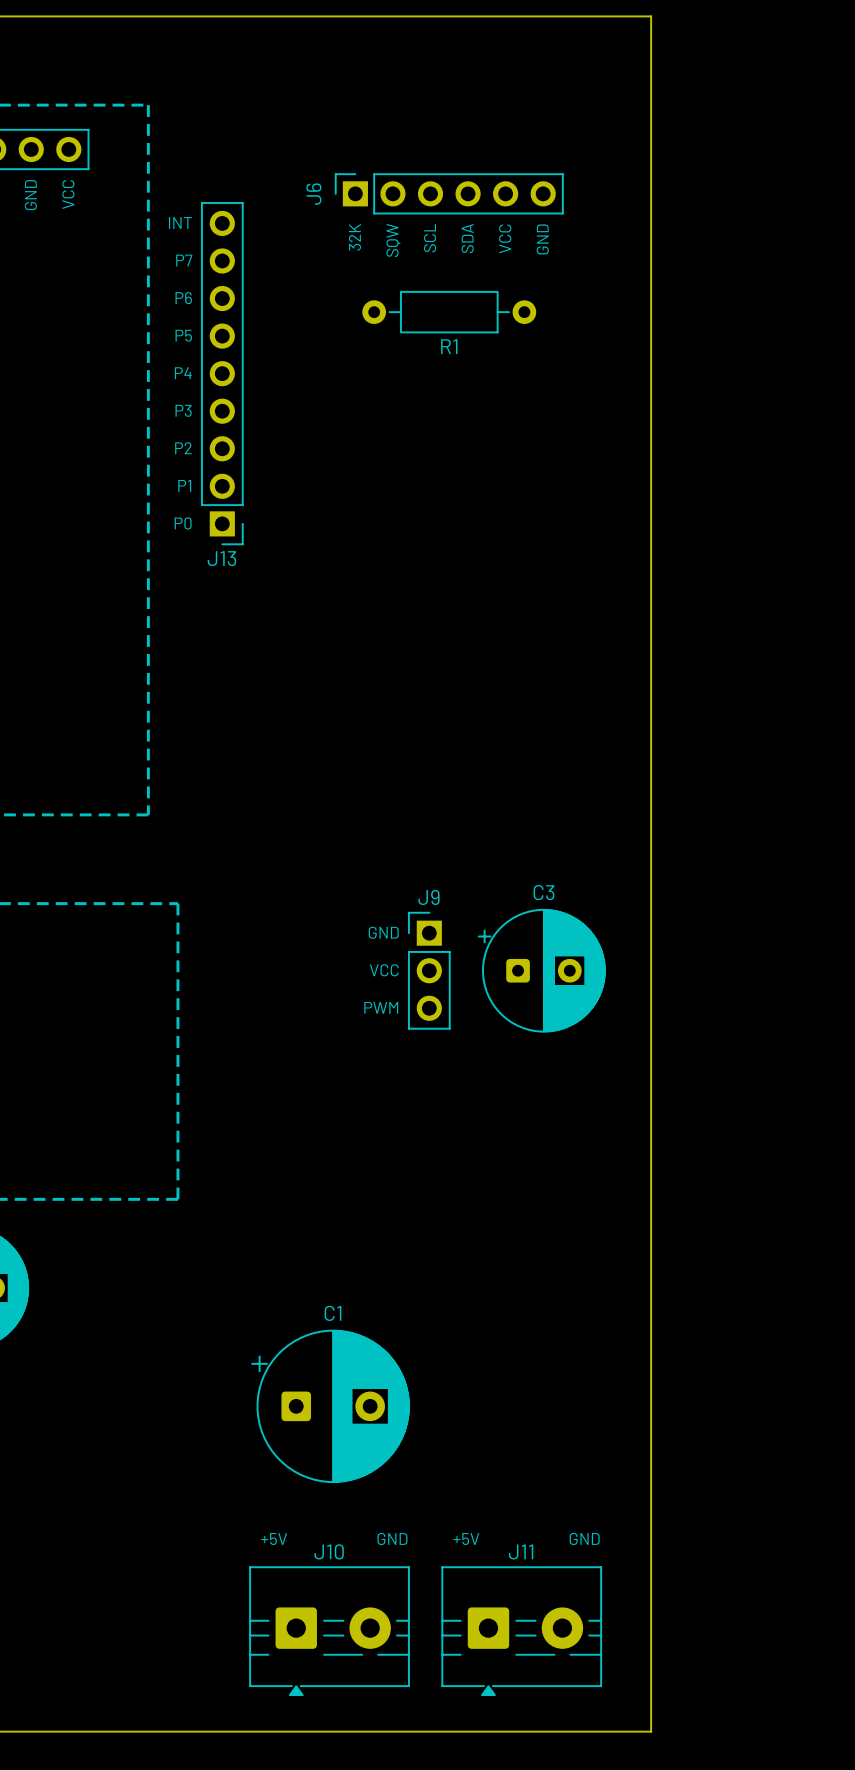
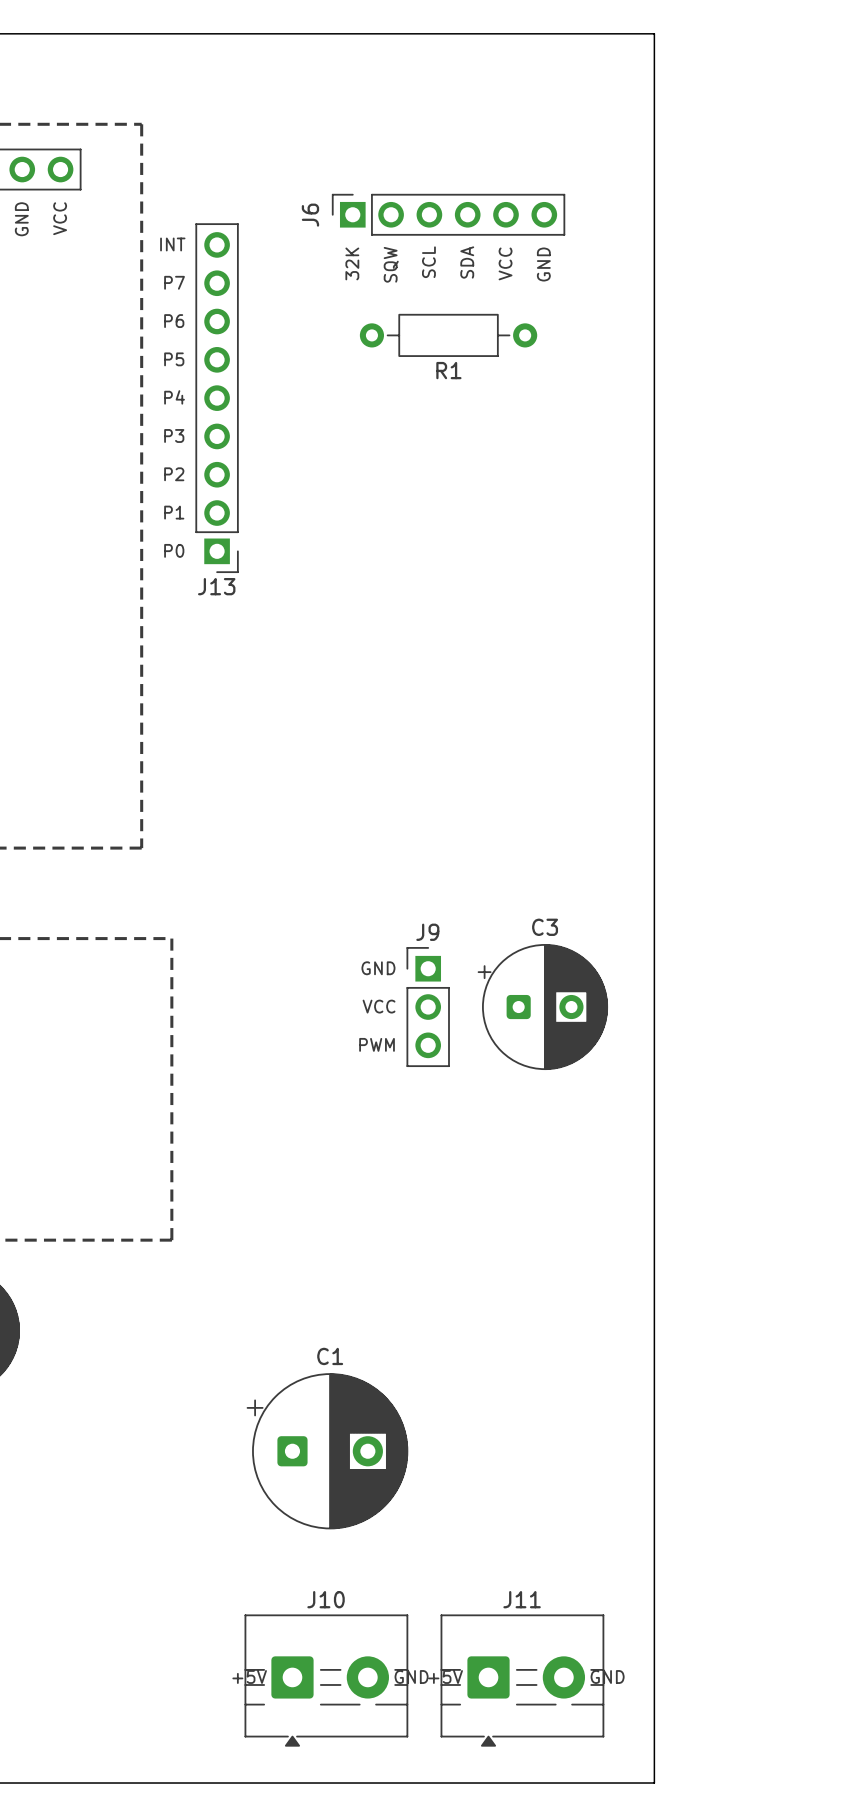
text position: GND (392, 1538) -> GND (411, 1677)
text position: GND (584, 1538) -> GND (607, 1677)
text position: +5V (274, 1539) -> +5V (249, 1677)
text position: +5V (466, 1539) -> +5V (445, 1677)

